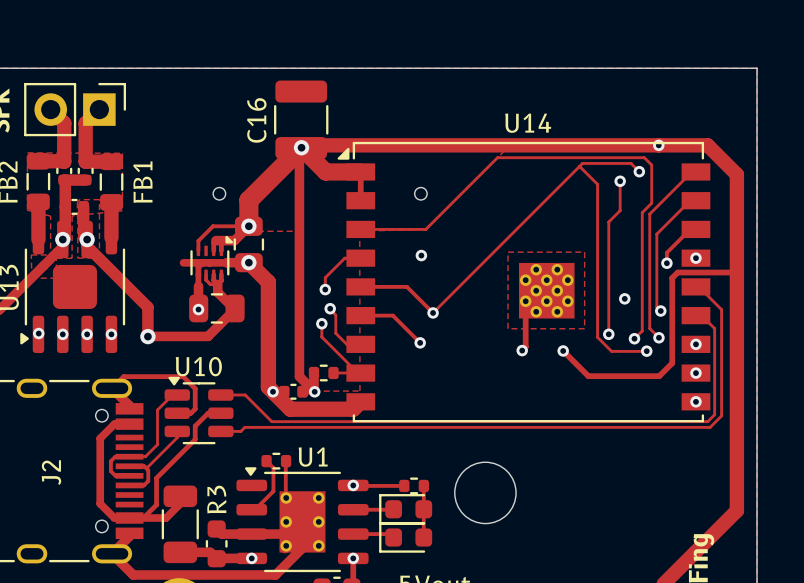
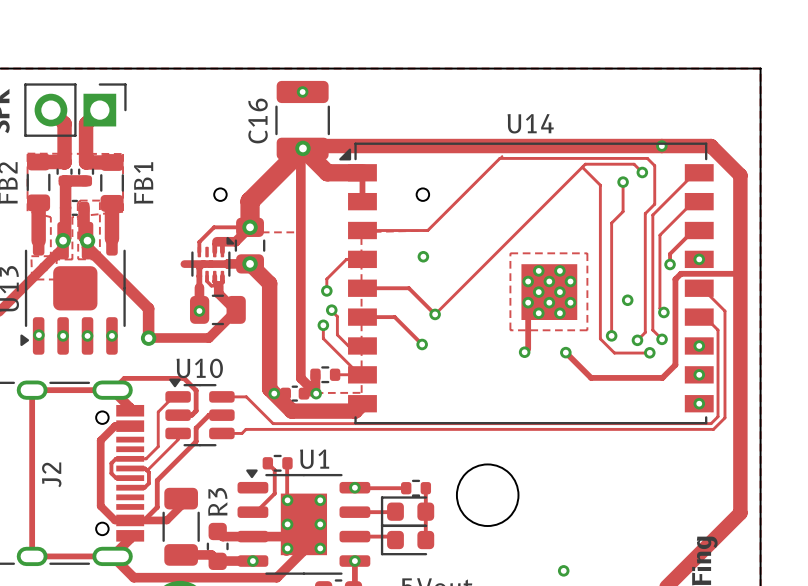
via: none -> (302, 91)
track: none -> (112, 390) (32, 390) (32, 556) (112, 556)
via: none -> (563, 570)

